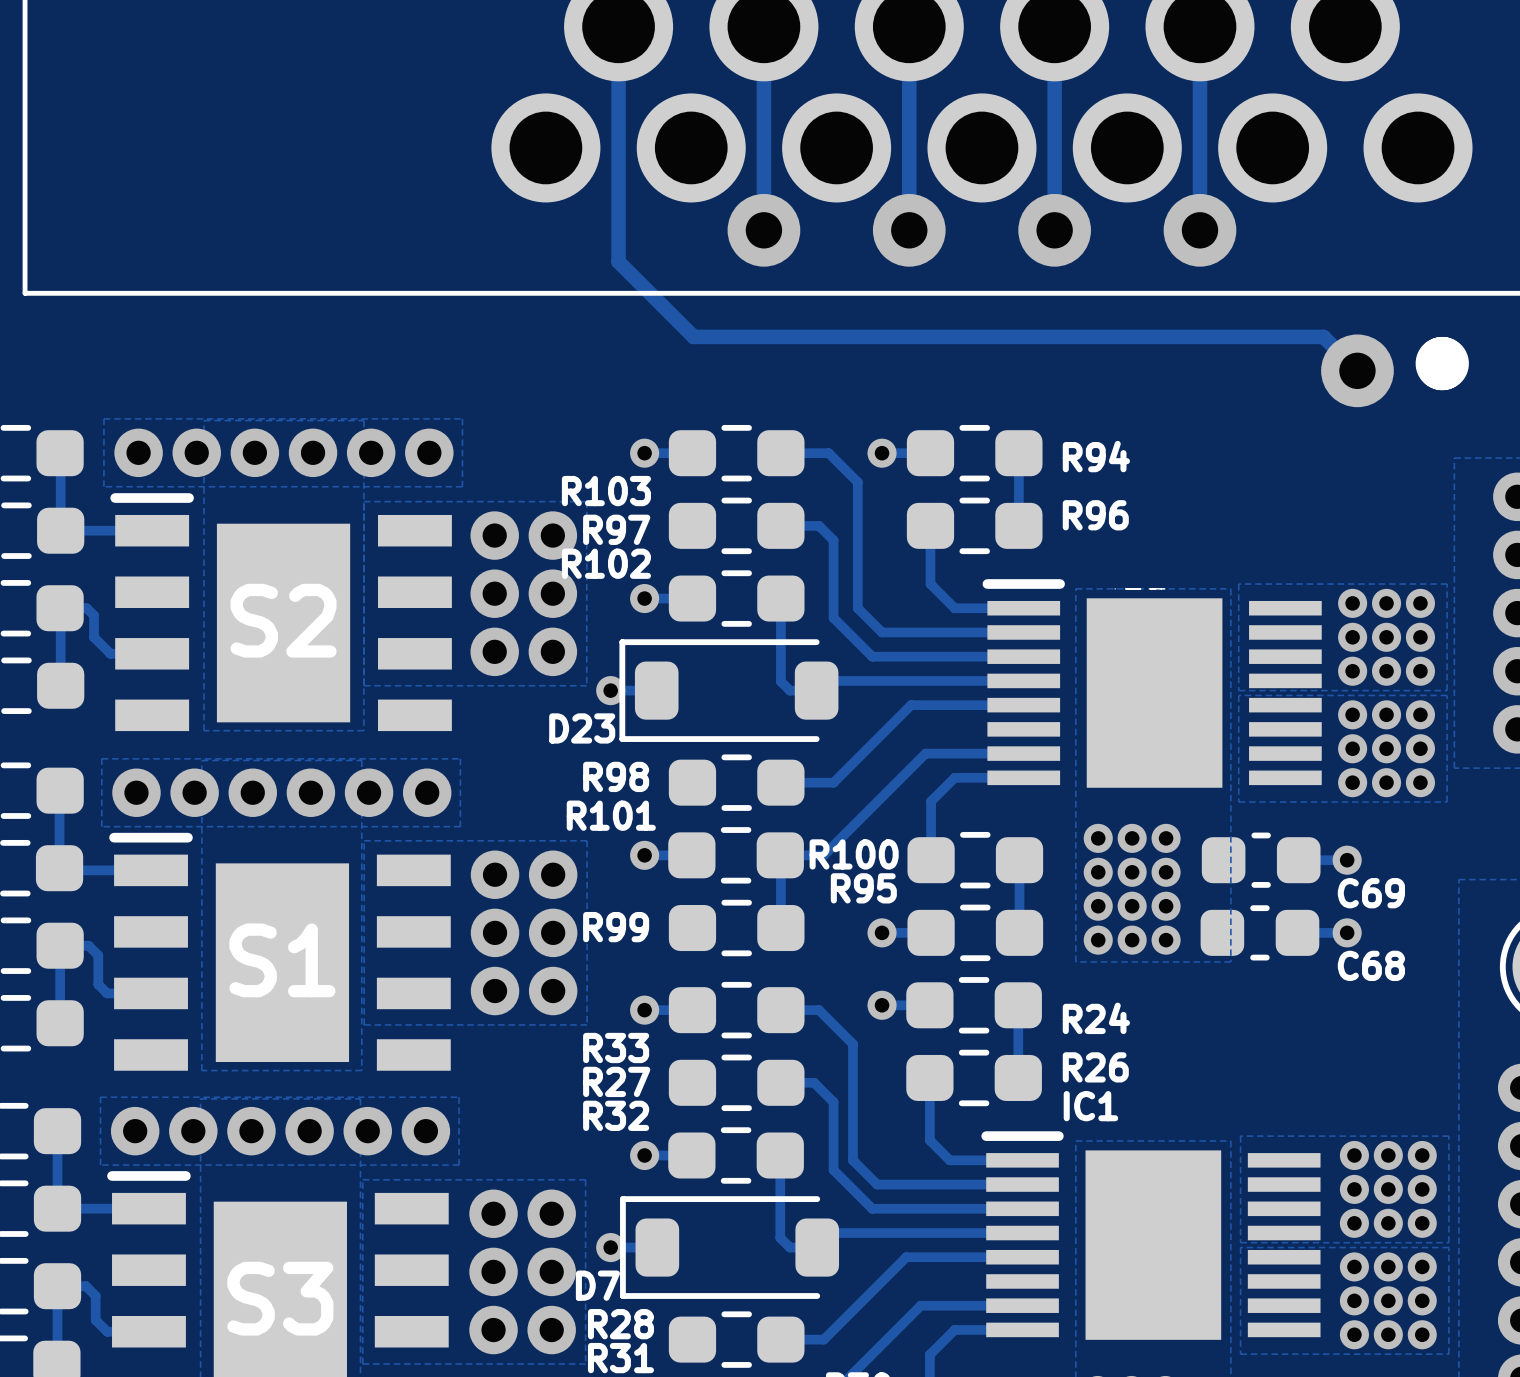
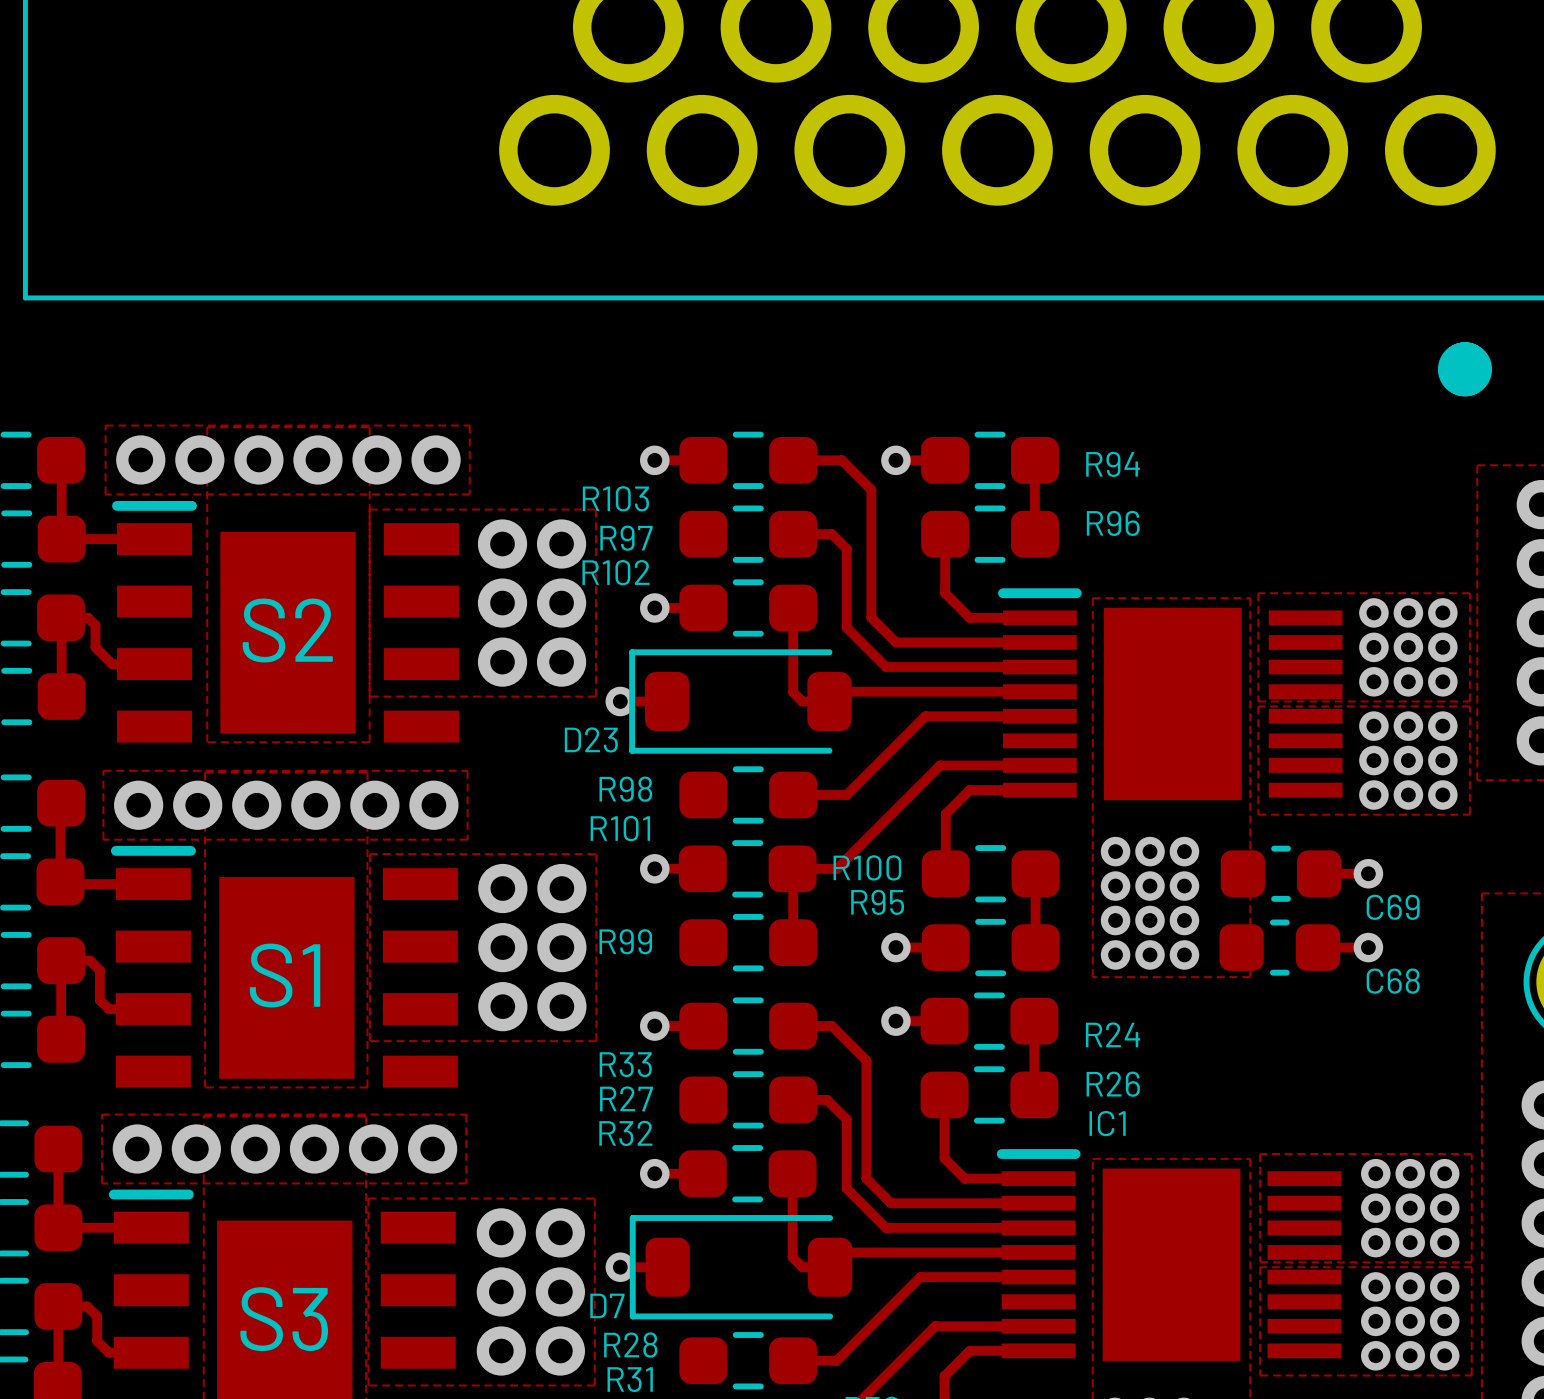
track: (618, 26) (618, 261) (693, 336) (1323, 336) (1357, 370) -> none
track: (763, 26) (763, 230) -> none
track: (909, 26) (909, 230) -> none
track: (1054, 26) (1054, 230) -> none
track: (1199, 26) (1199, 230) -> none
via: (763, 230) -> none
via: (909, 230) -> none
via: (1054, 230) -> none
via: (1199, 230) -> none
via: (1357, 370) -> none

